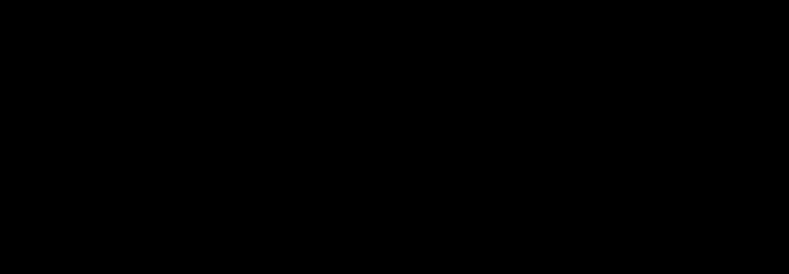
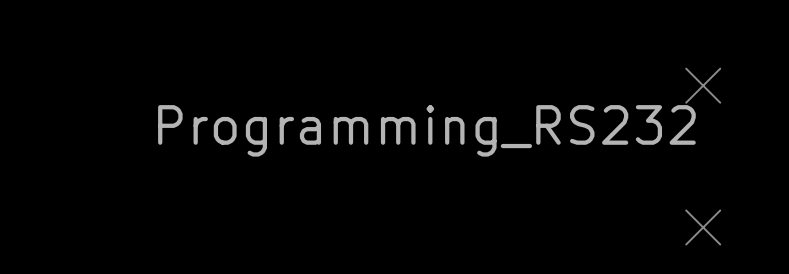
no-connect mark: none -> (703, 85)
label: none -> Programming_RS232 (426, 130)
no-connect mark: none -> (703, 227)

